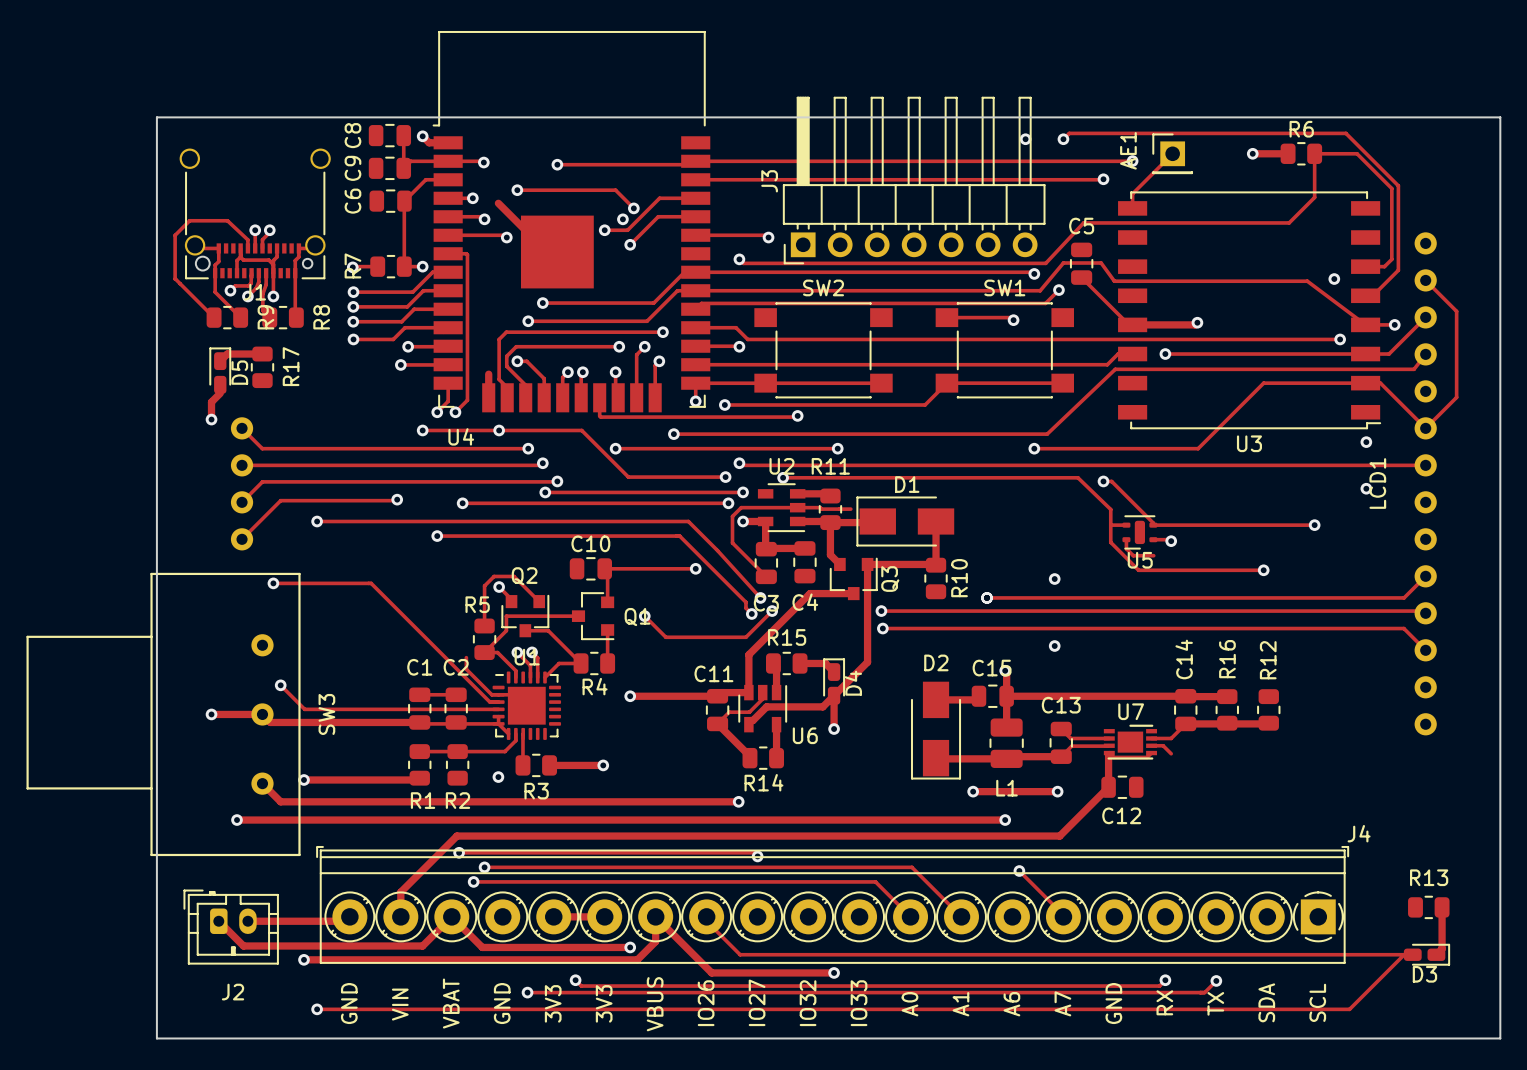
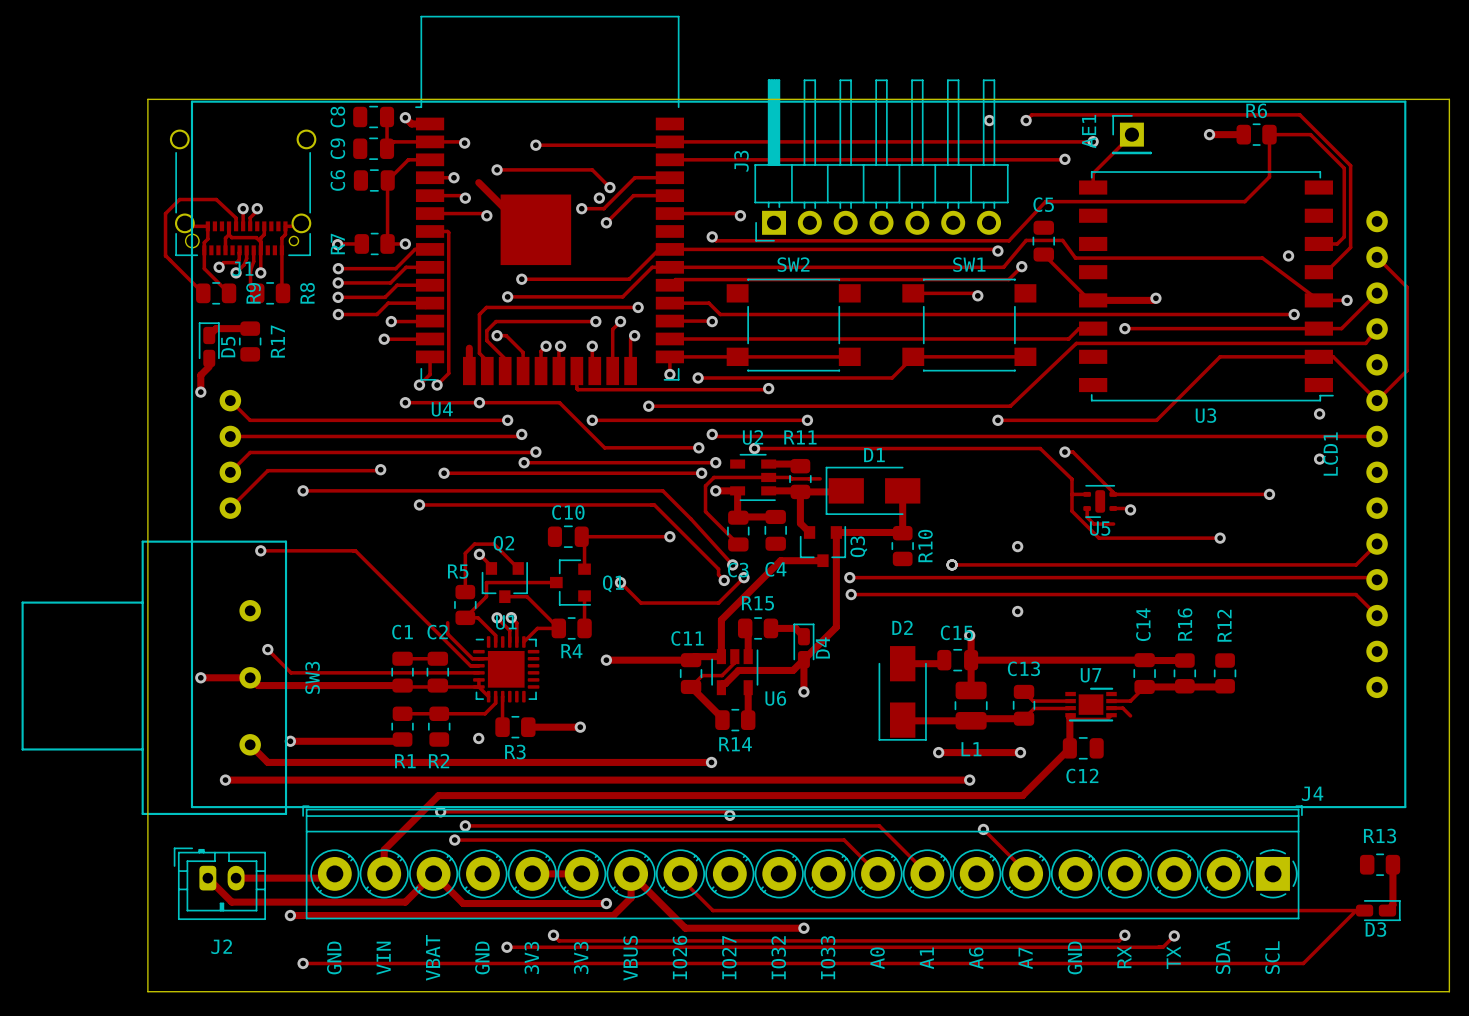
LCD1 footprint: [230, 232, 1437, 736] -> [190, 100, 1407, 809]

